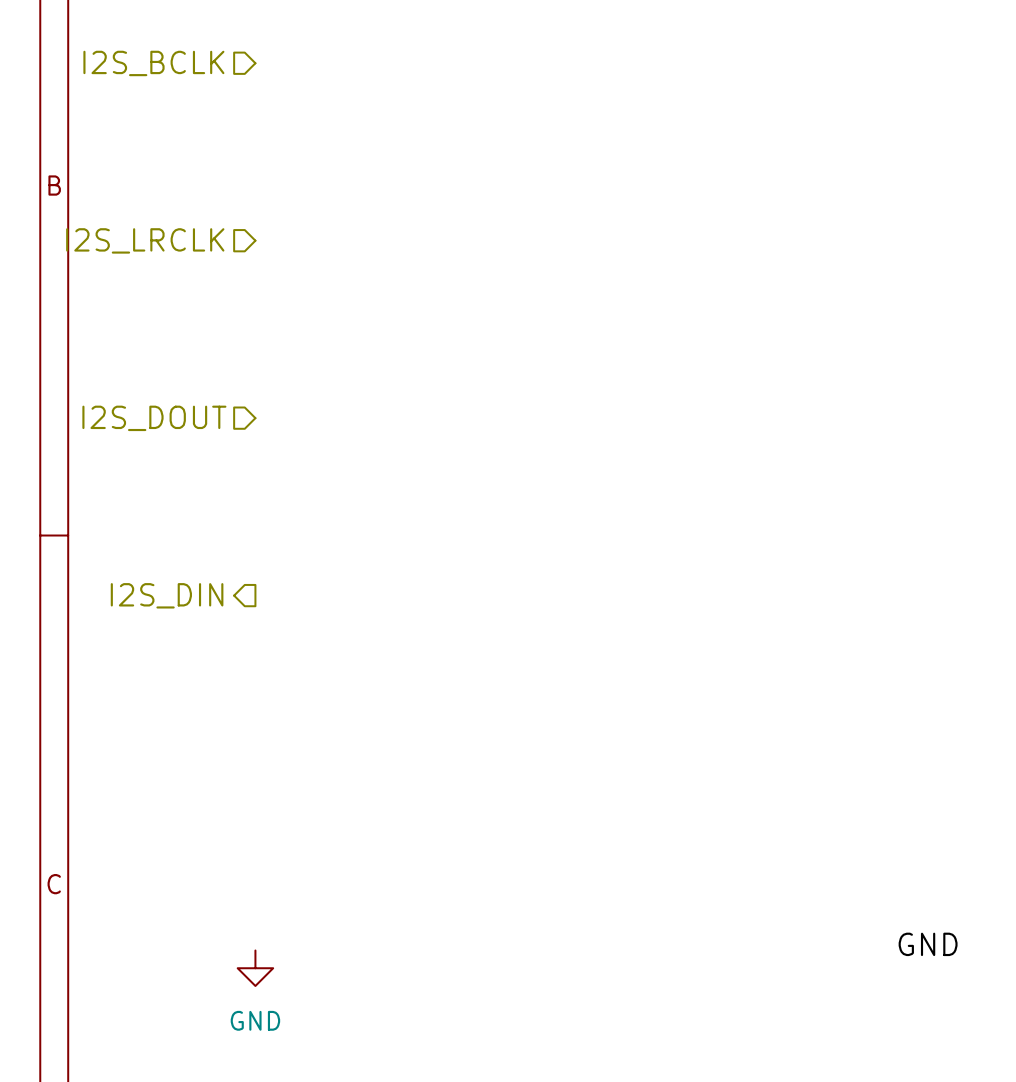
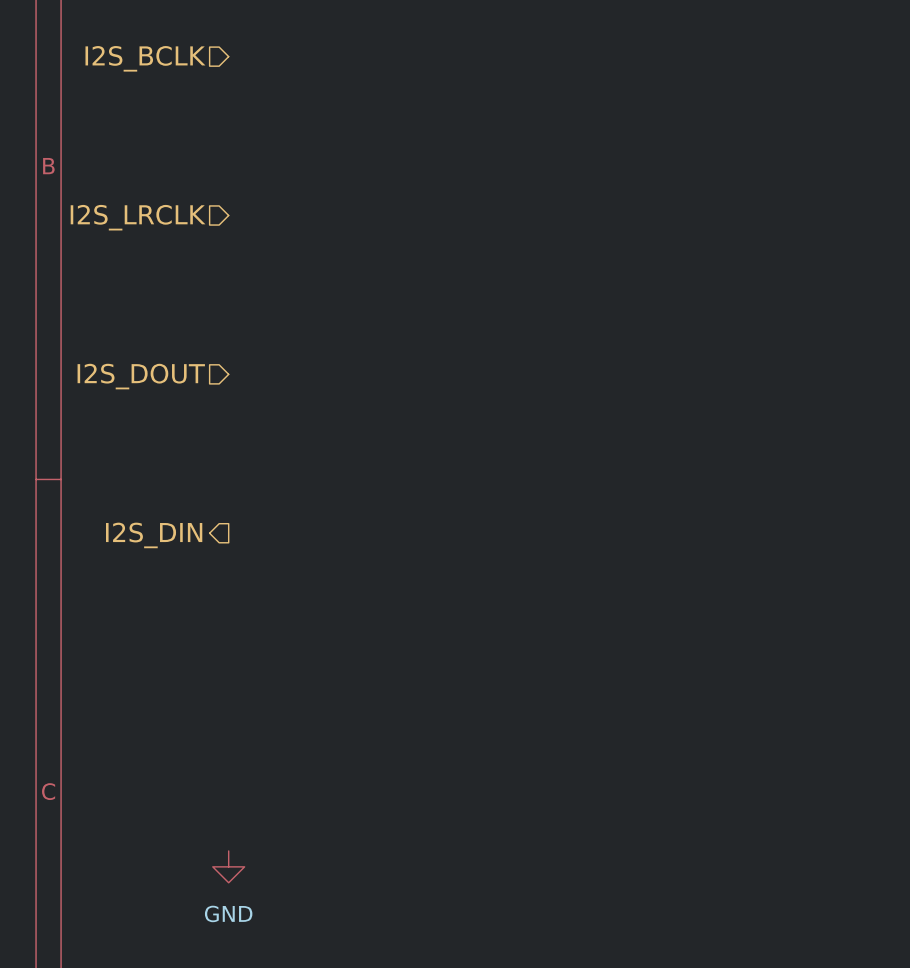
label: GND (928, 944) -> none

